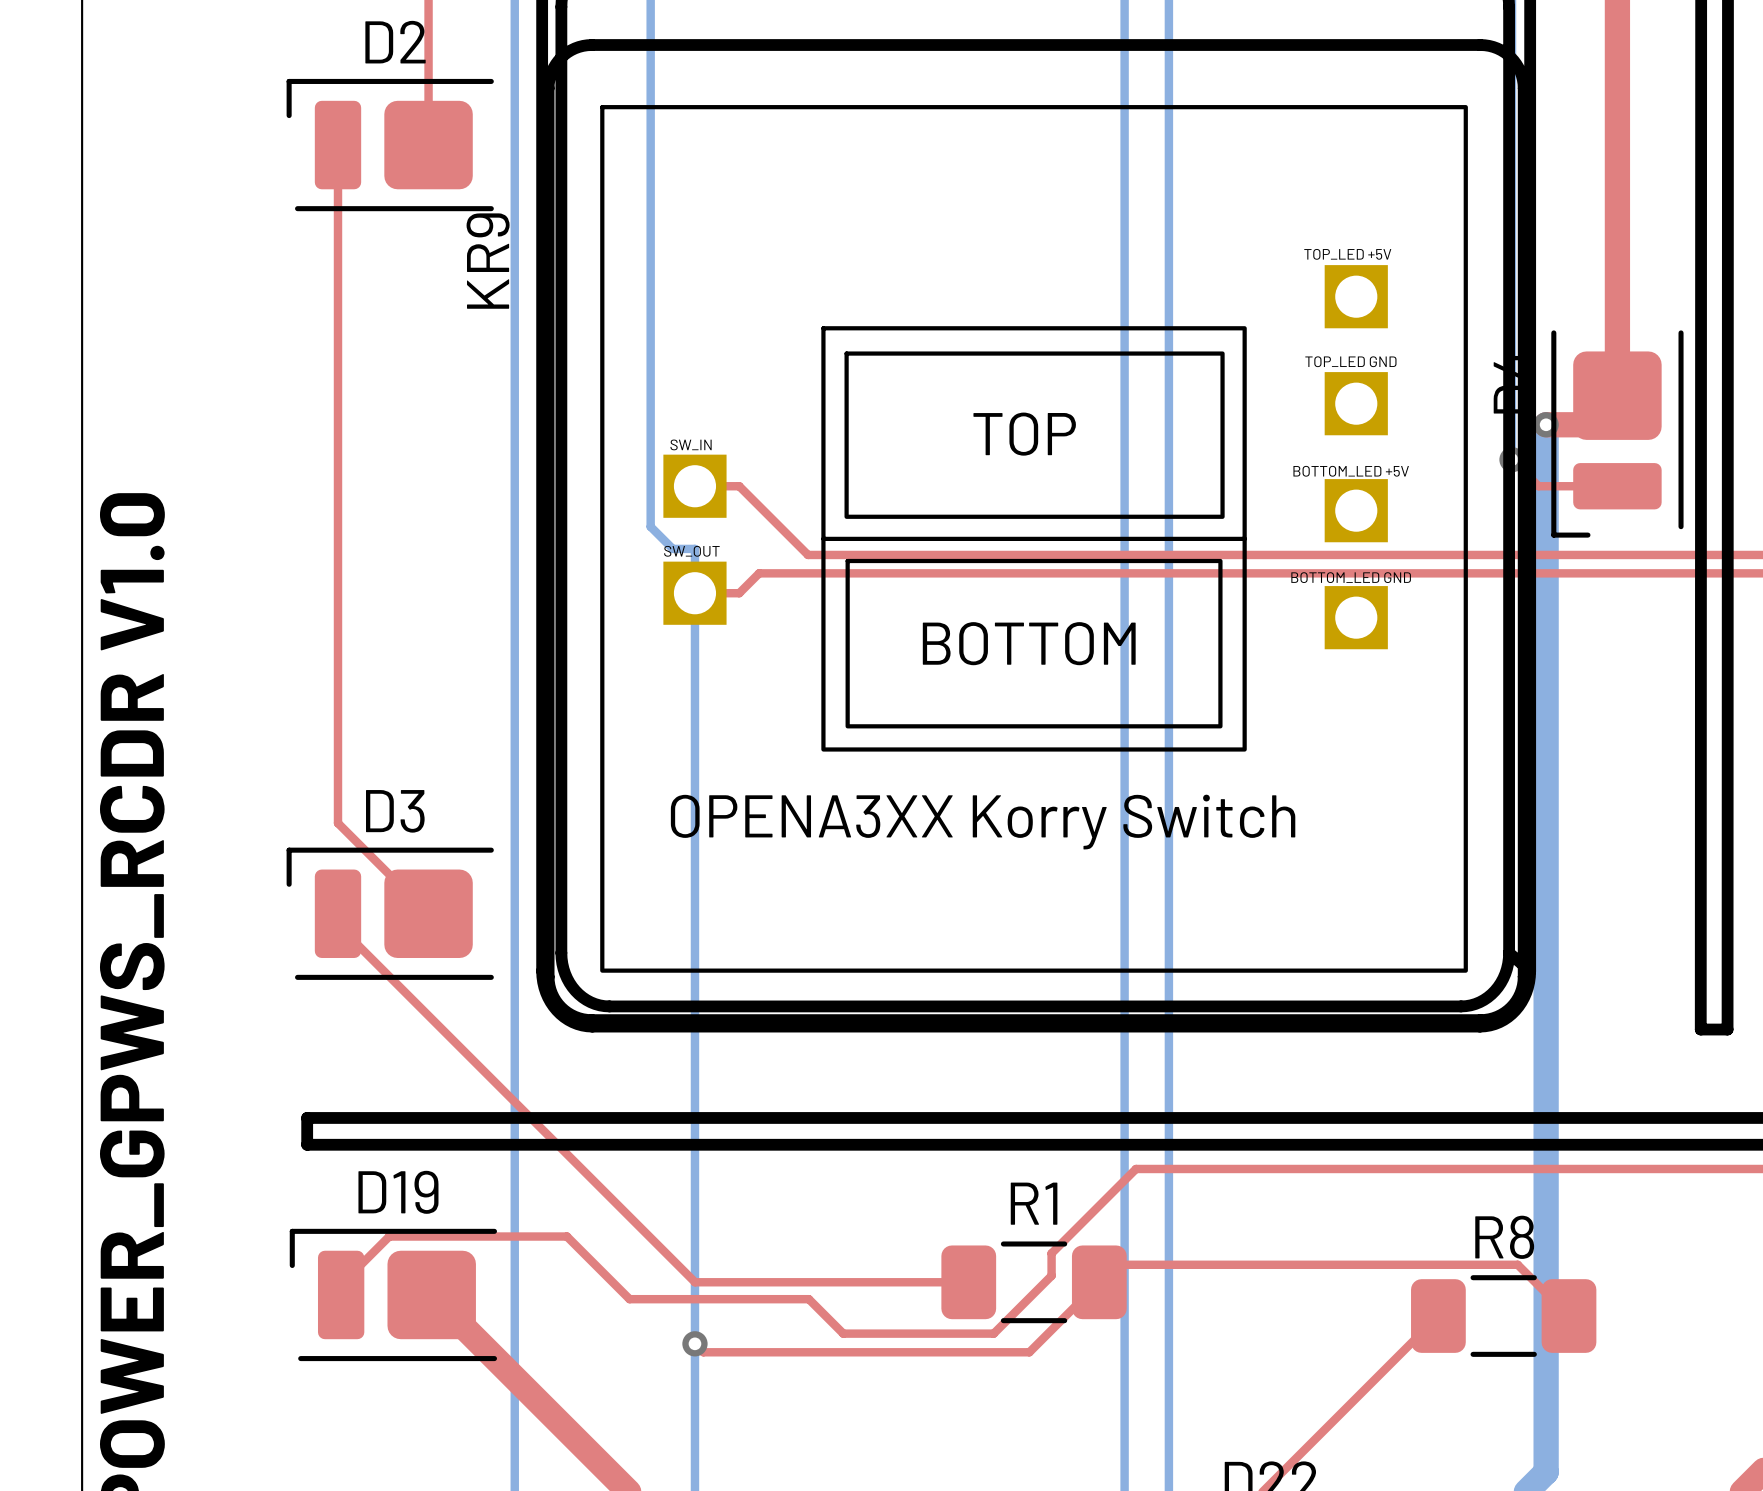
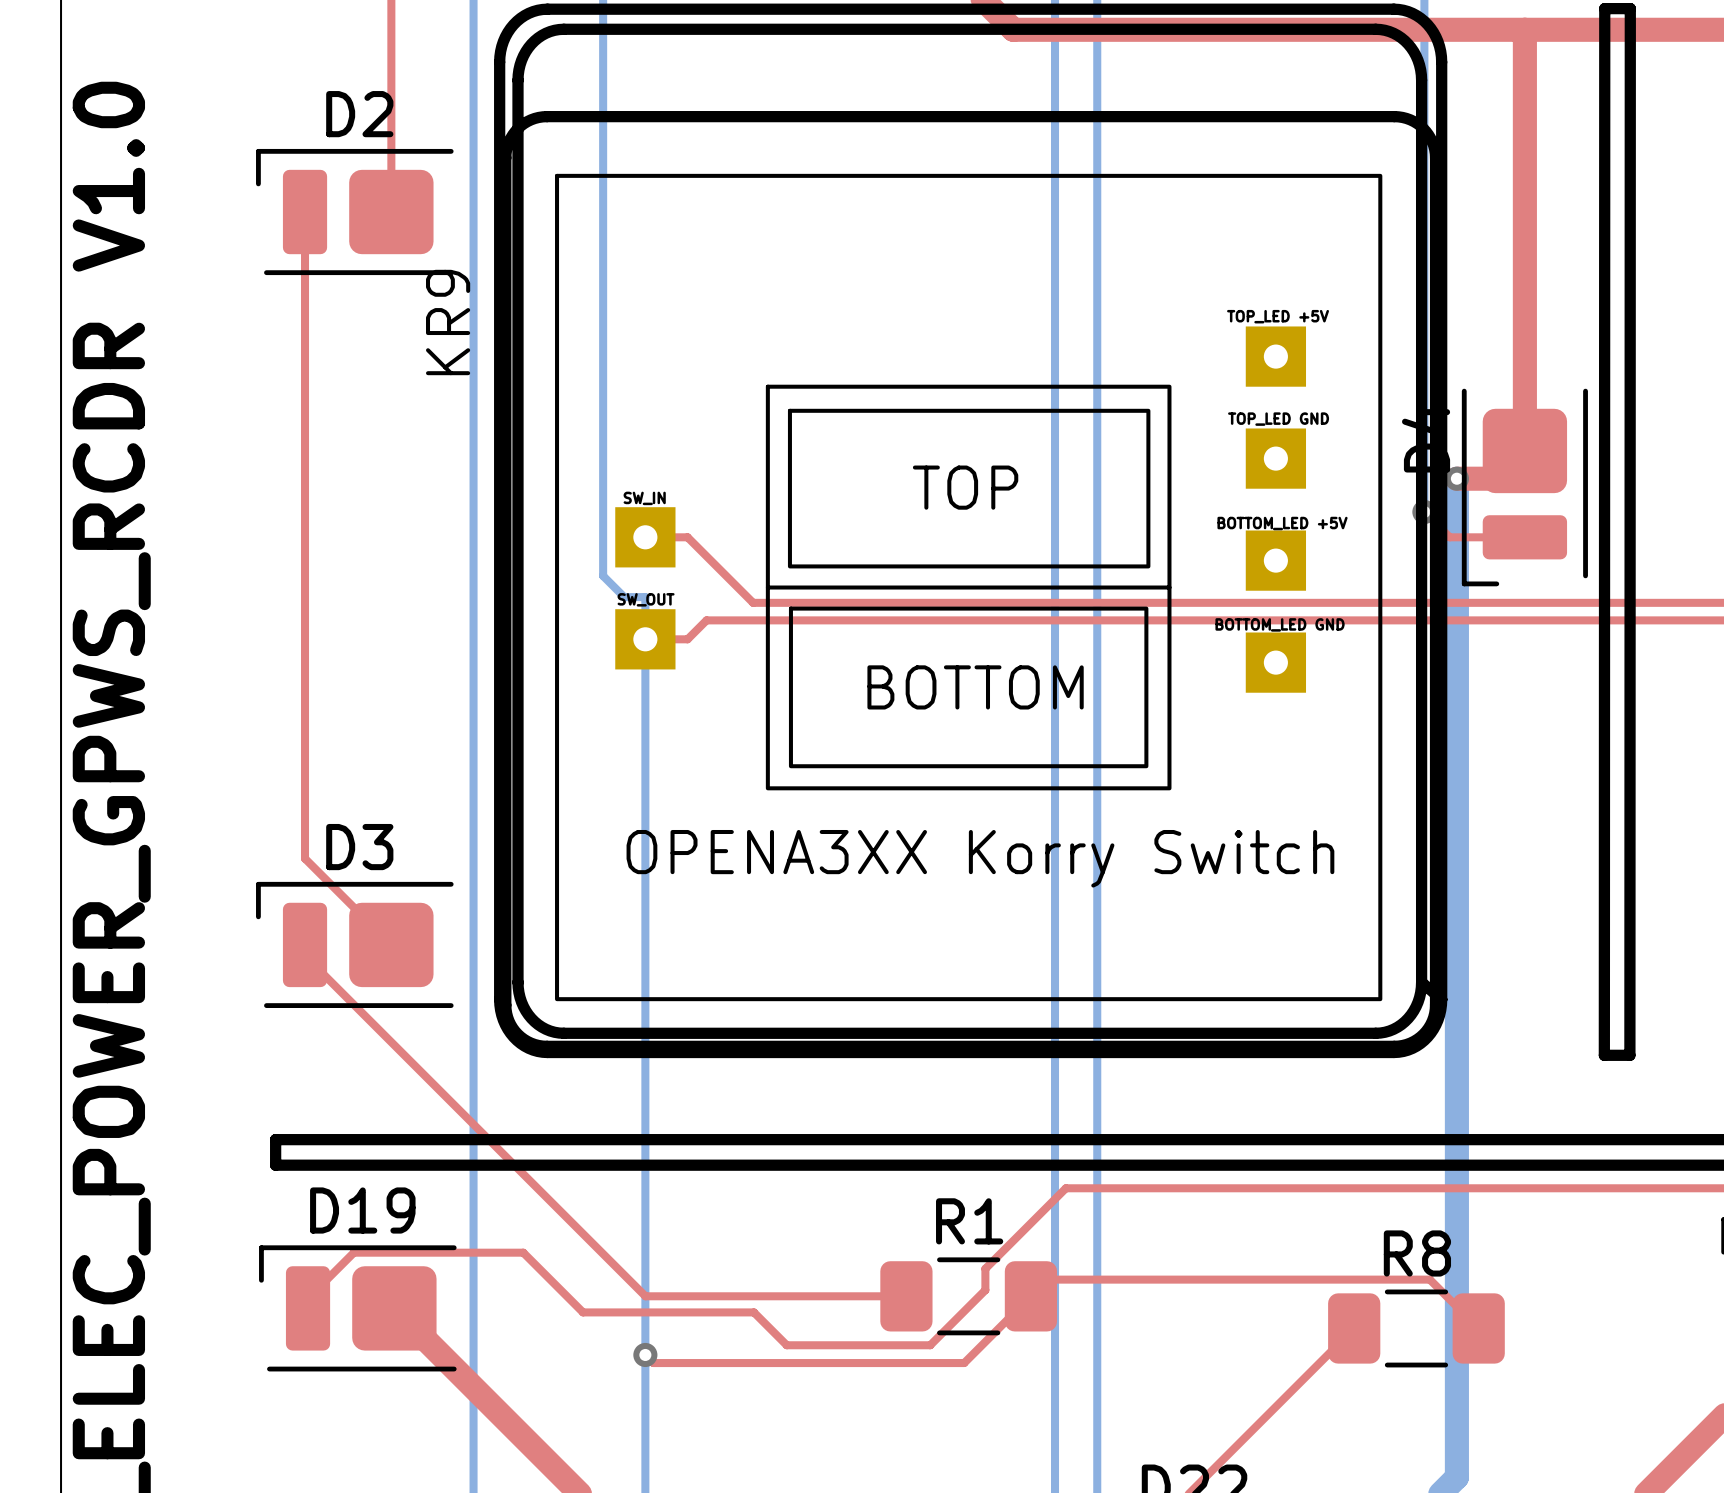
KR9 footprint: [600, 105, 1468, 973] -> [555, 173, 1383, 1002]

